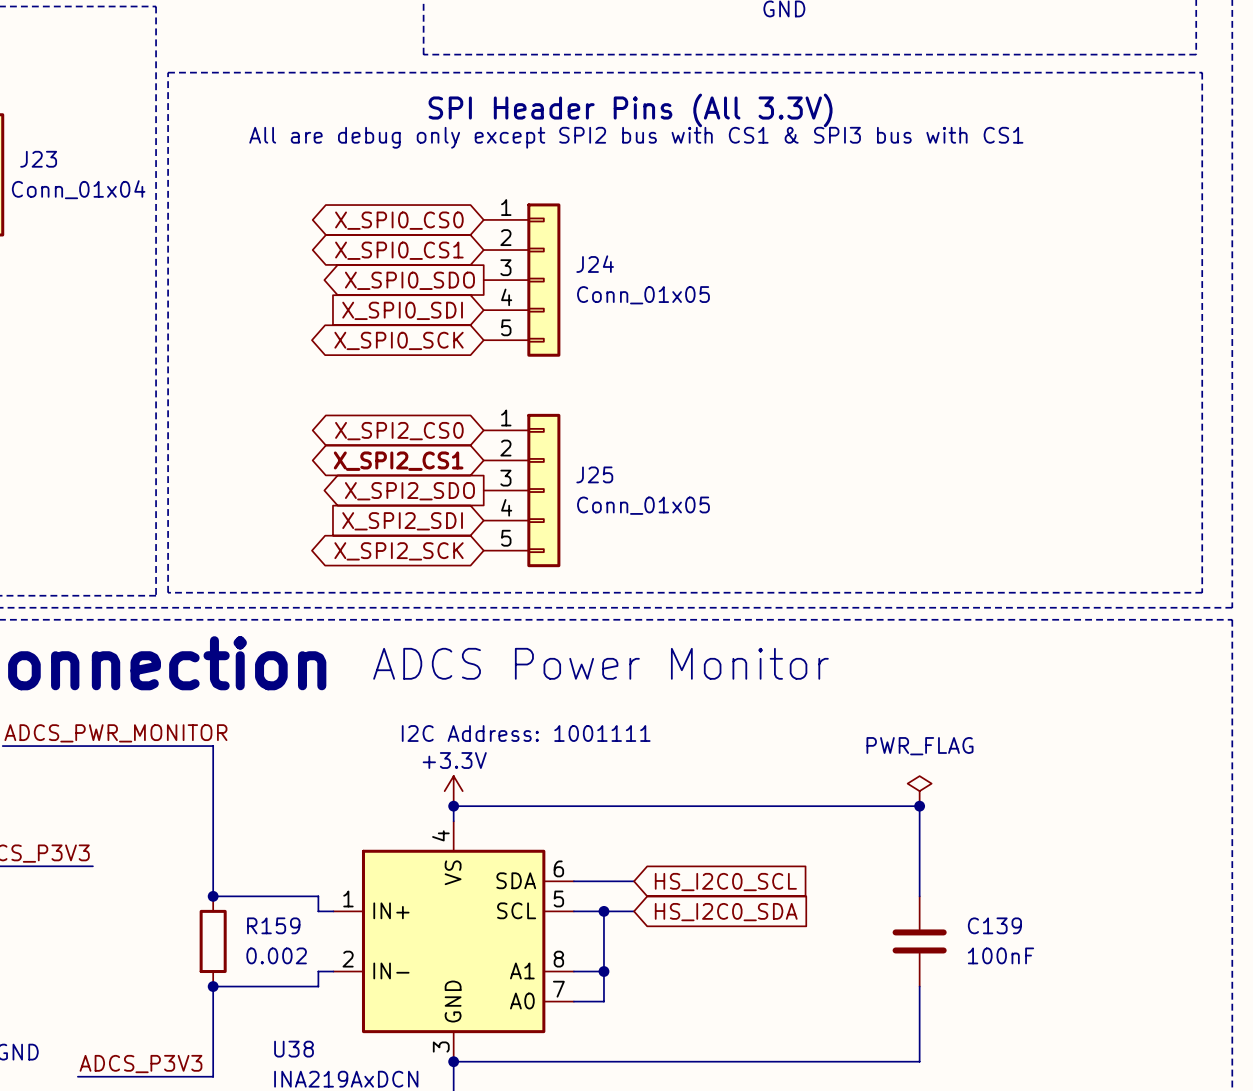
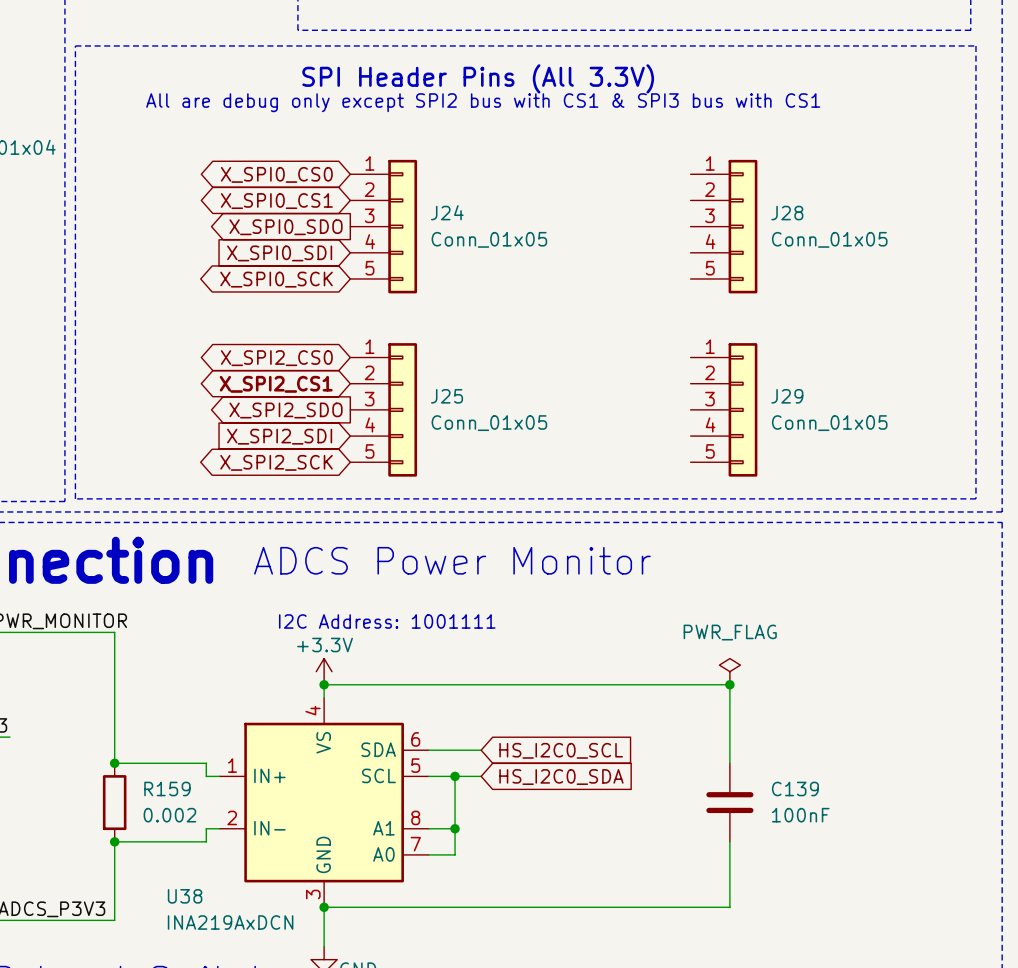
J28: none -> Conn_01x05 (724, 226)
J29: none -> Conn_01x05 (724, 409)

